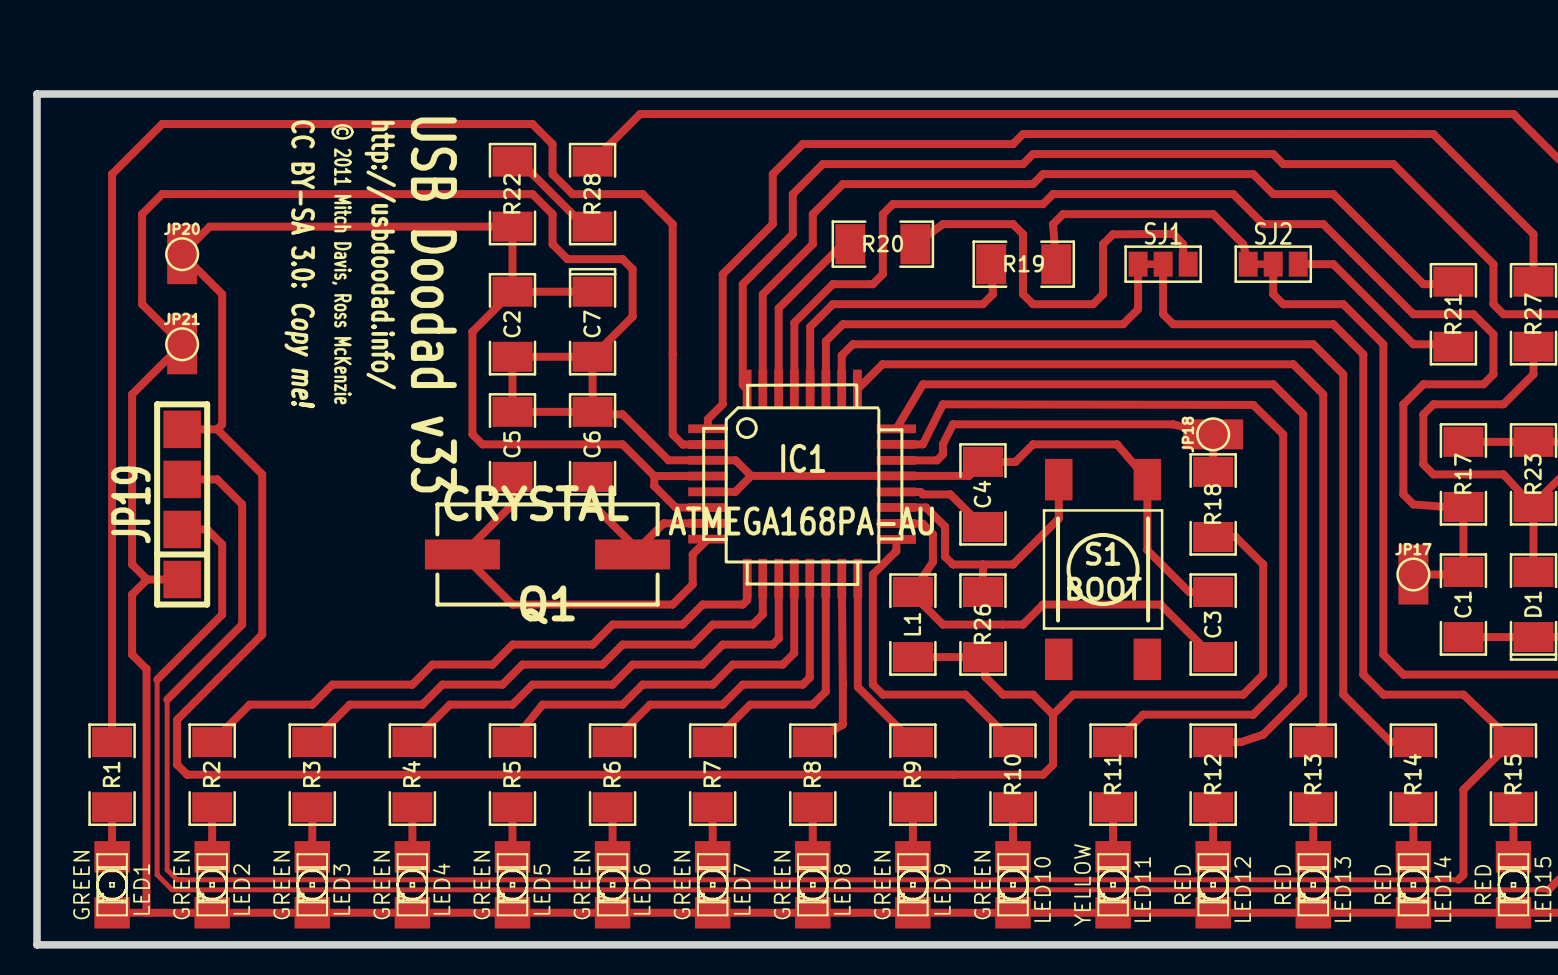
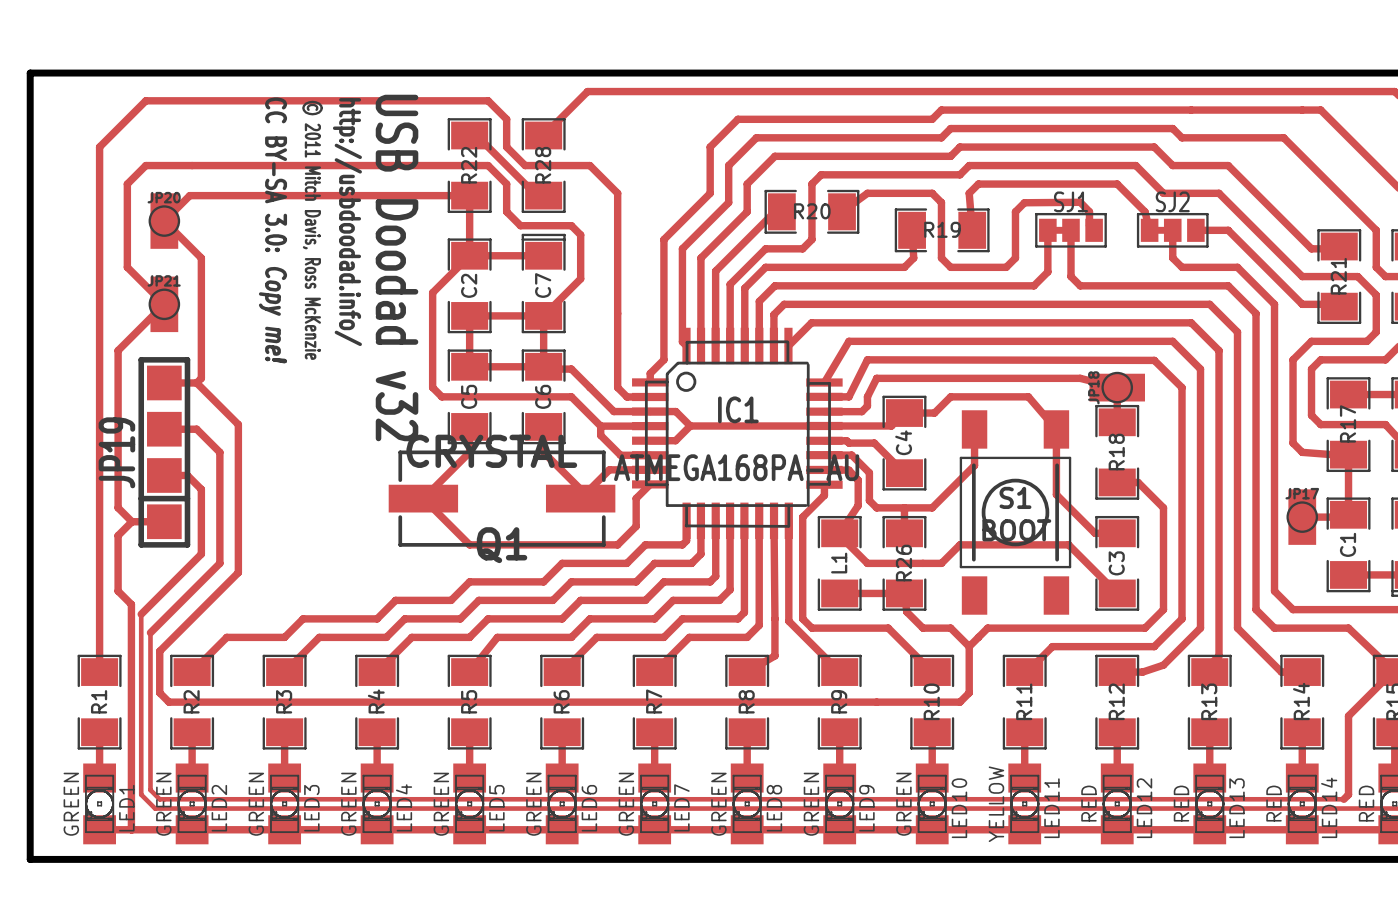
text: USB Doodad v33 (433, 304) -> USB Doodad v32 (397, 267)

